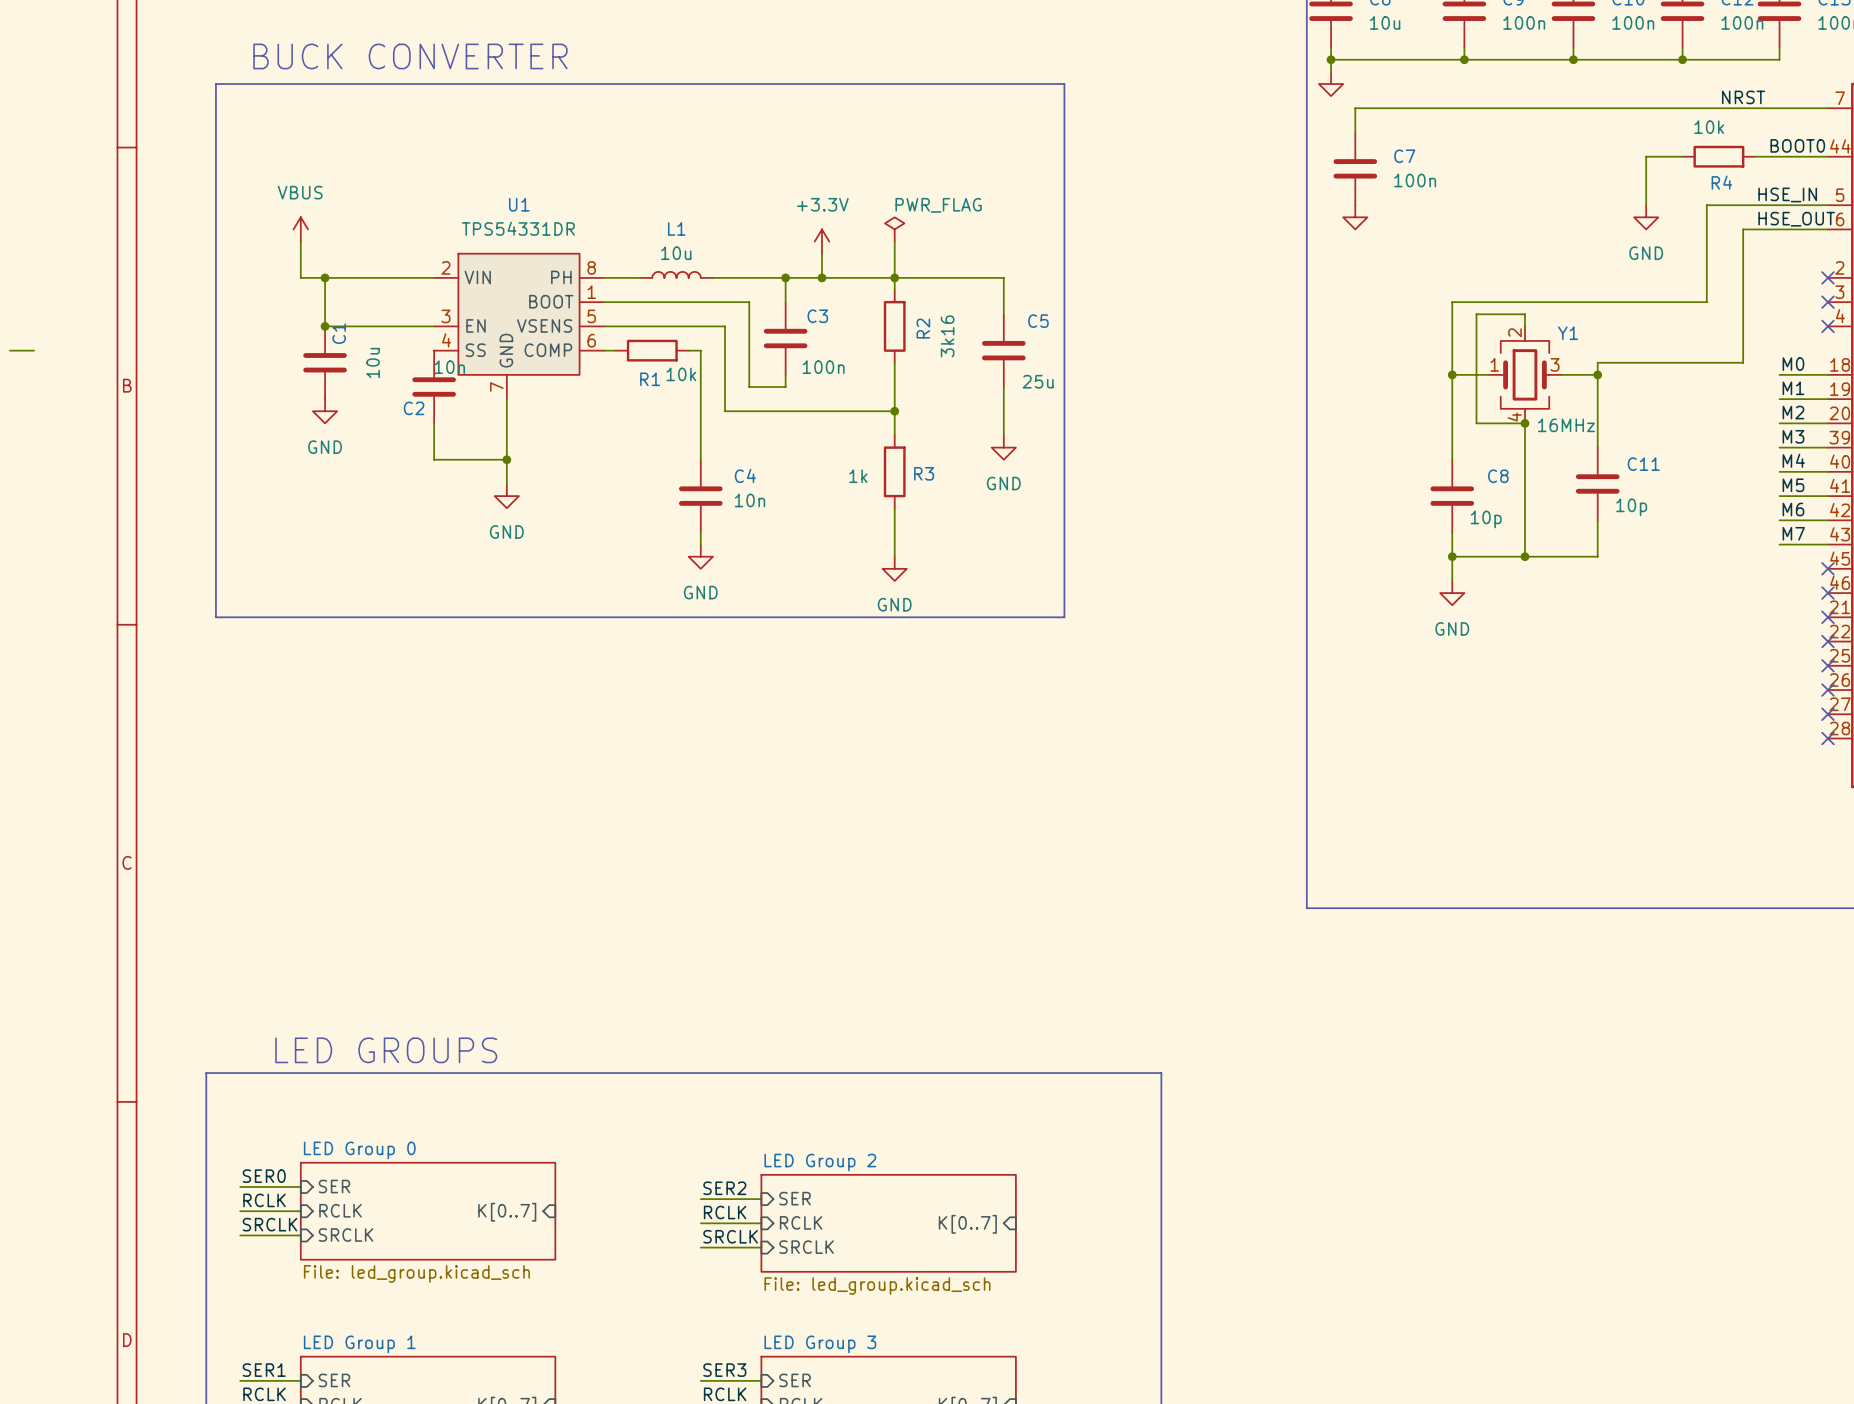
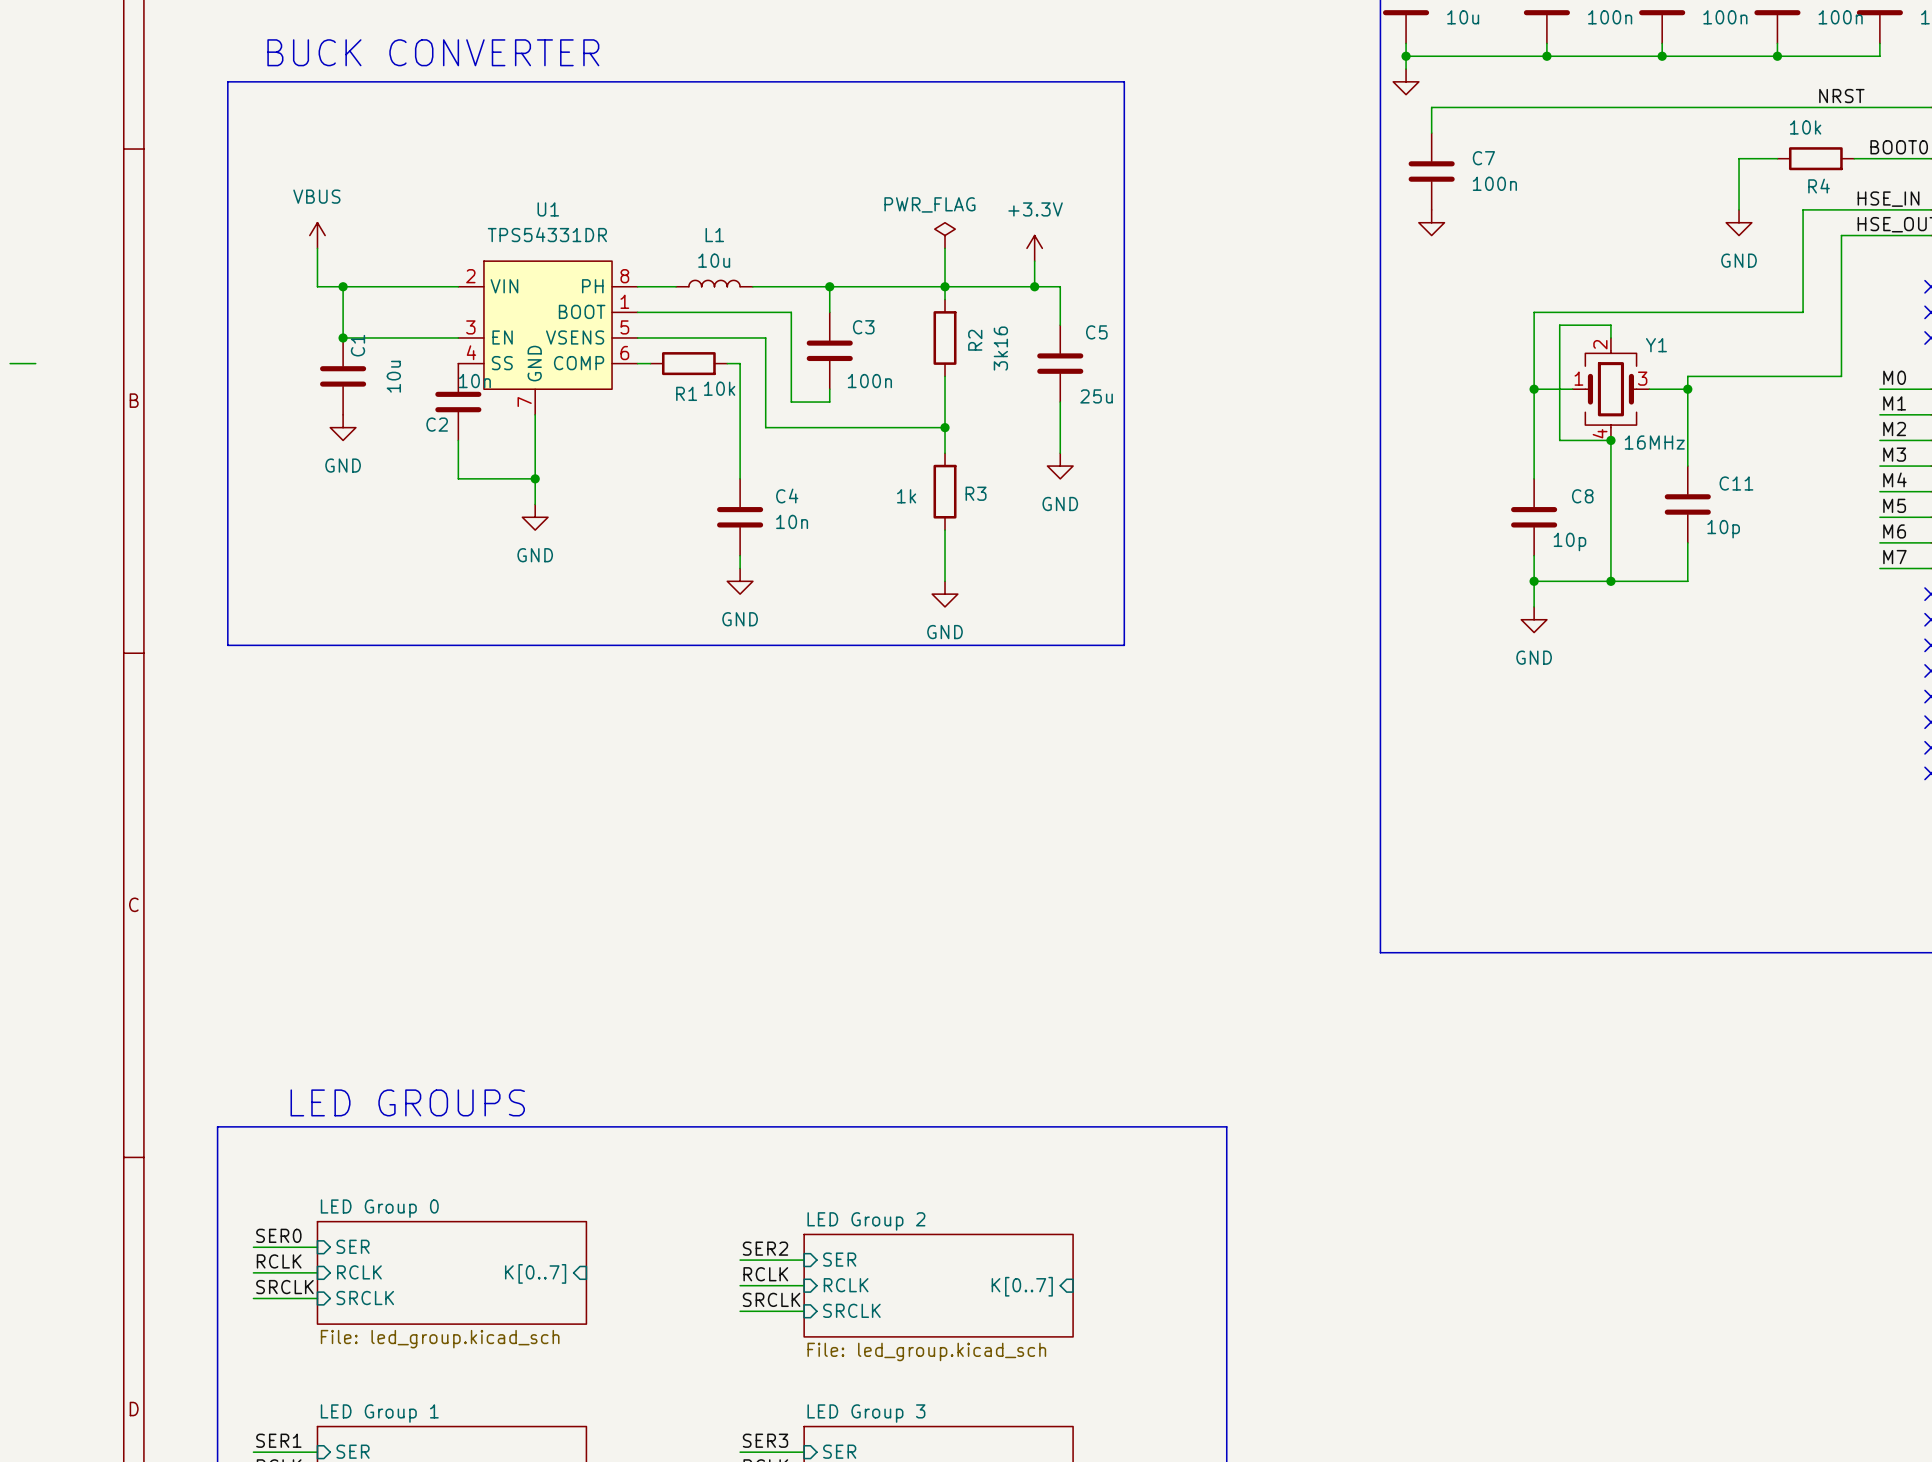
power symbol text position: PWR_FLAG (938, 205) -> PWR_FLAG (929, 204)
power symbol position: +3.3V (821, 241) -> +3.3V (1034, 248)
wire: (821, 253) (821, 277) -> (1034, 261) (1034, 286)
junction: (821, 277) -> none
junction: none -> (1034, 286)

